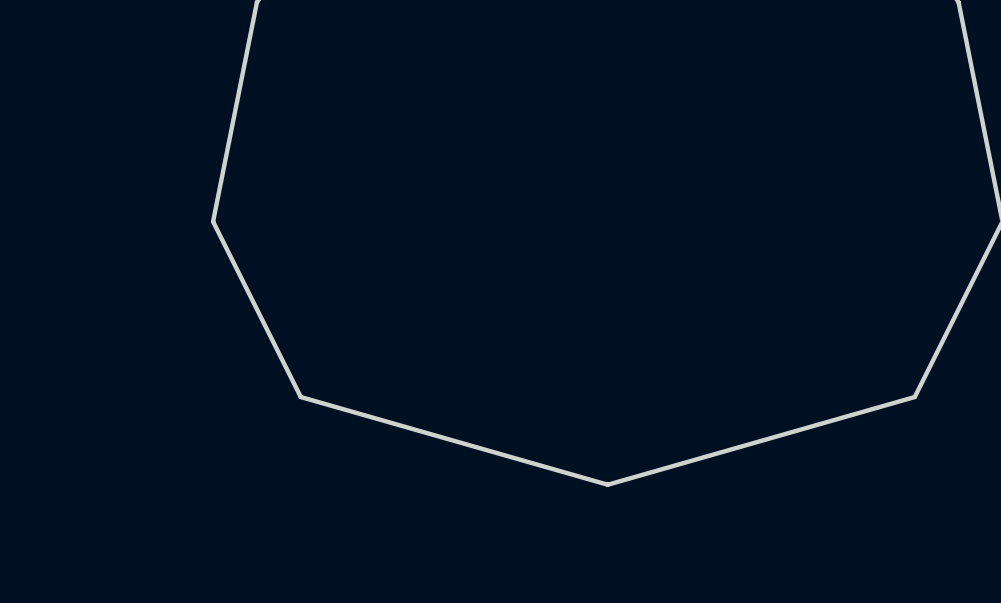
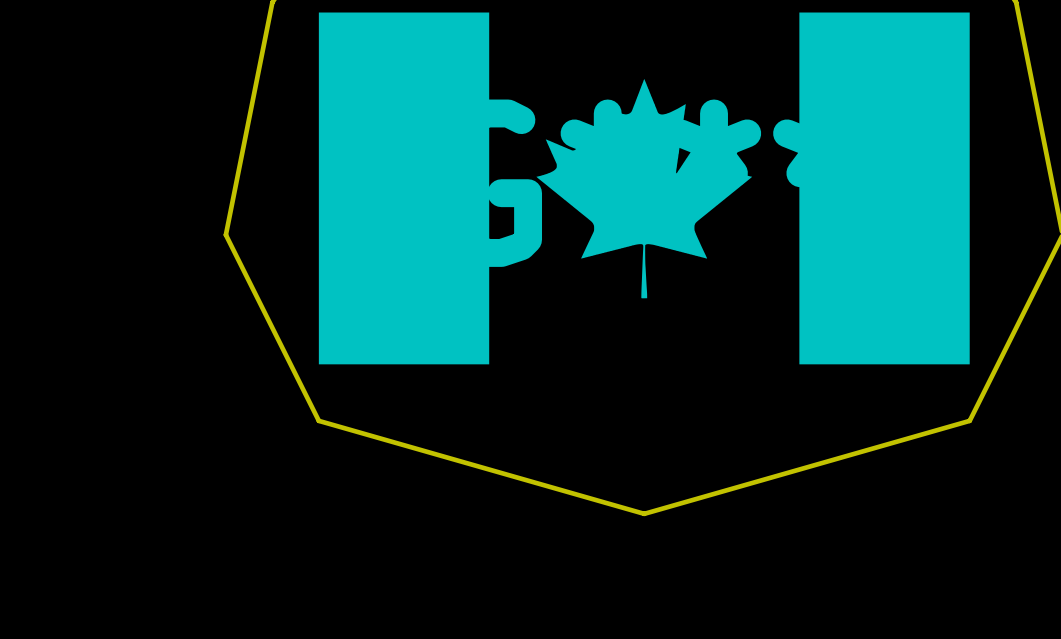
part: none -> (644, 188)

